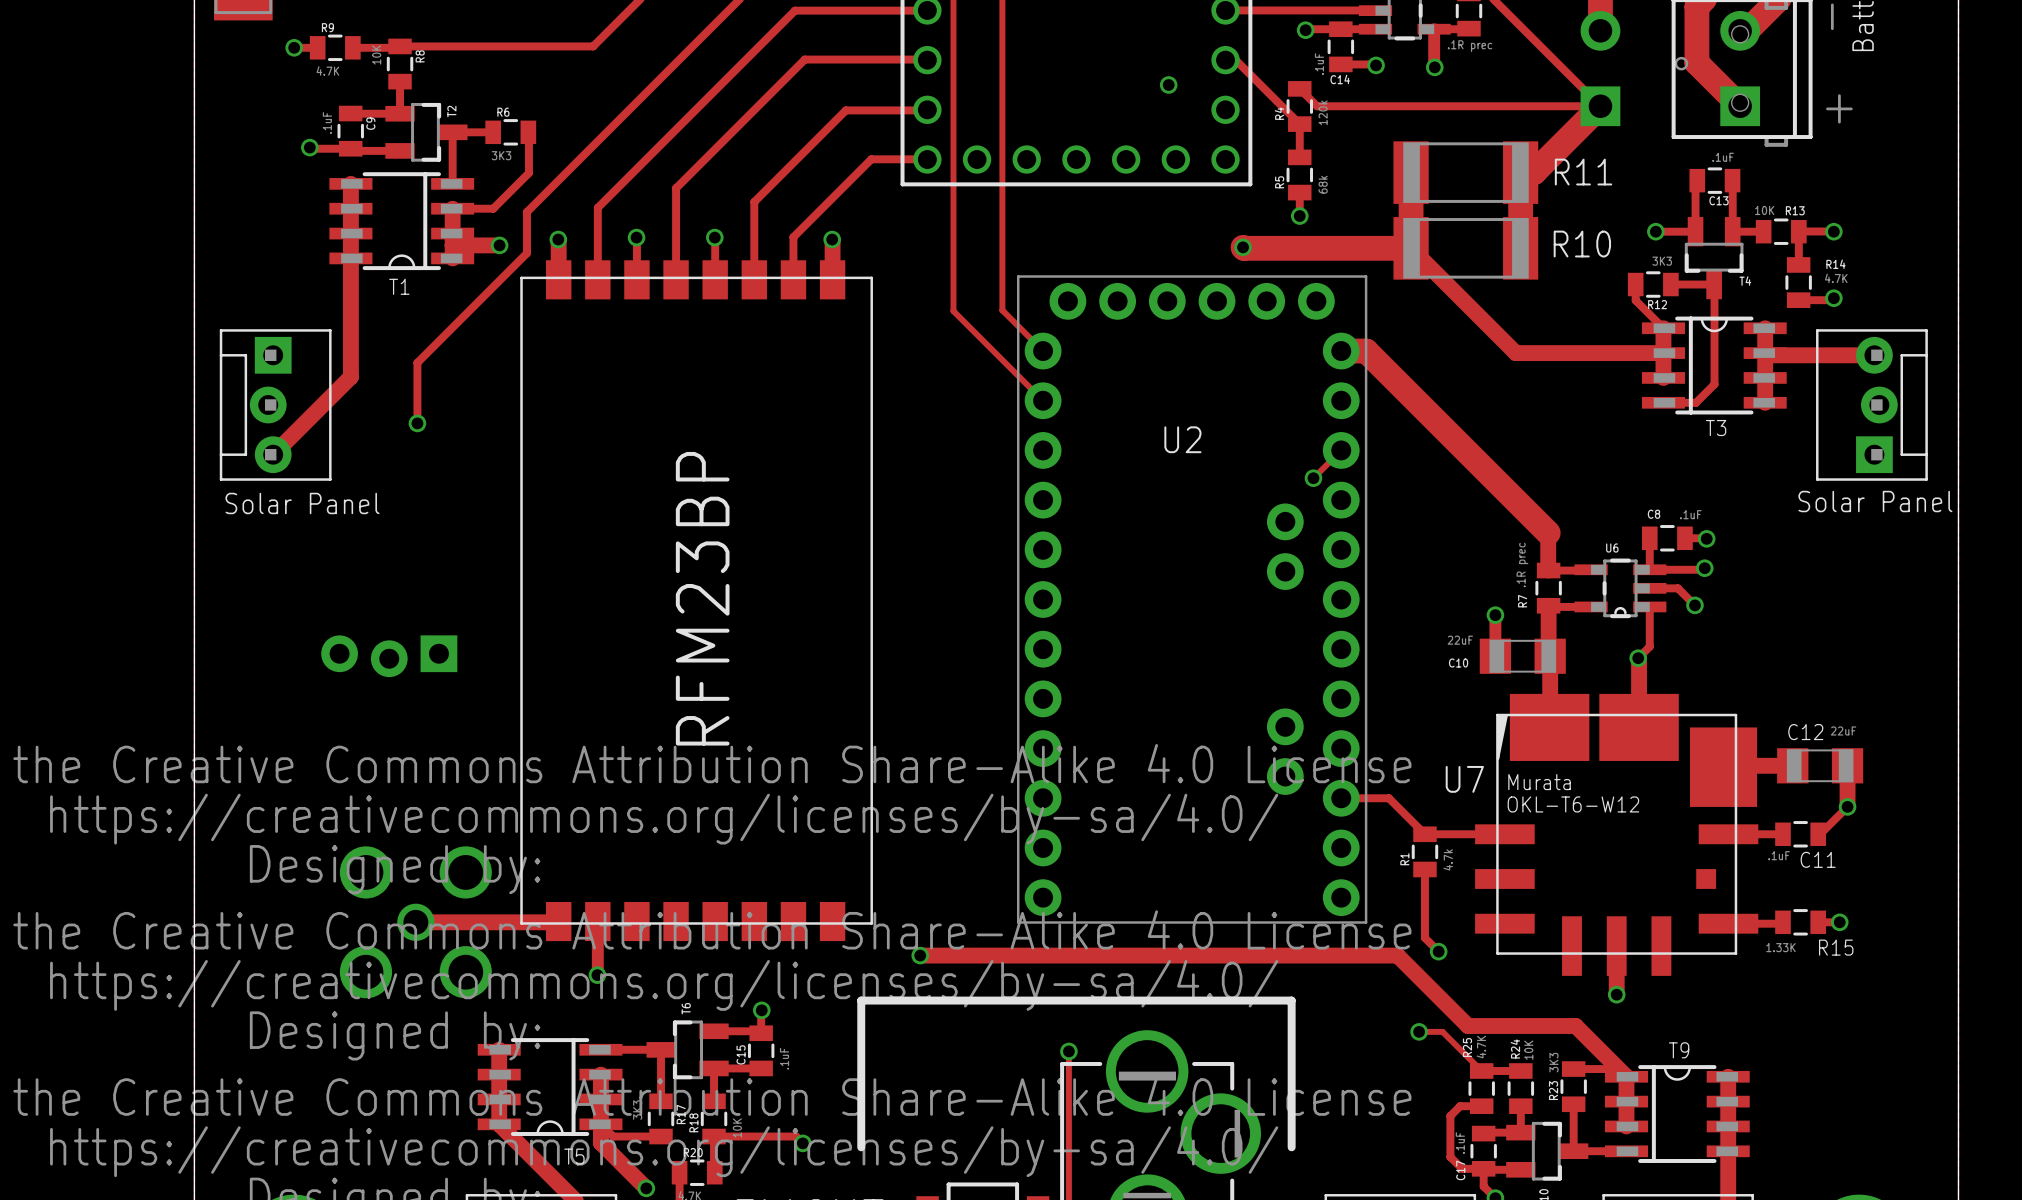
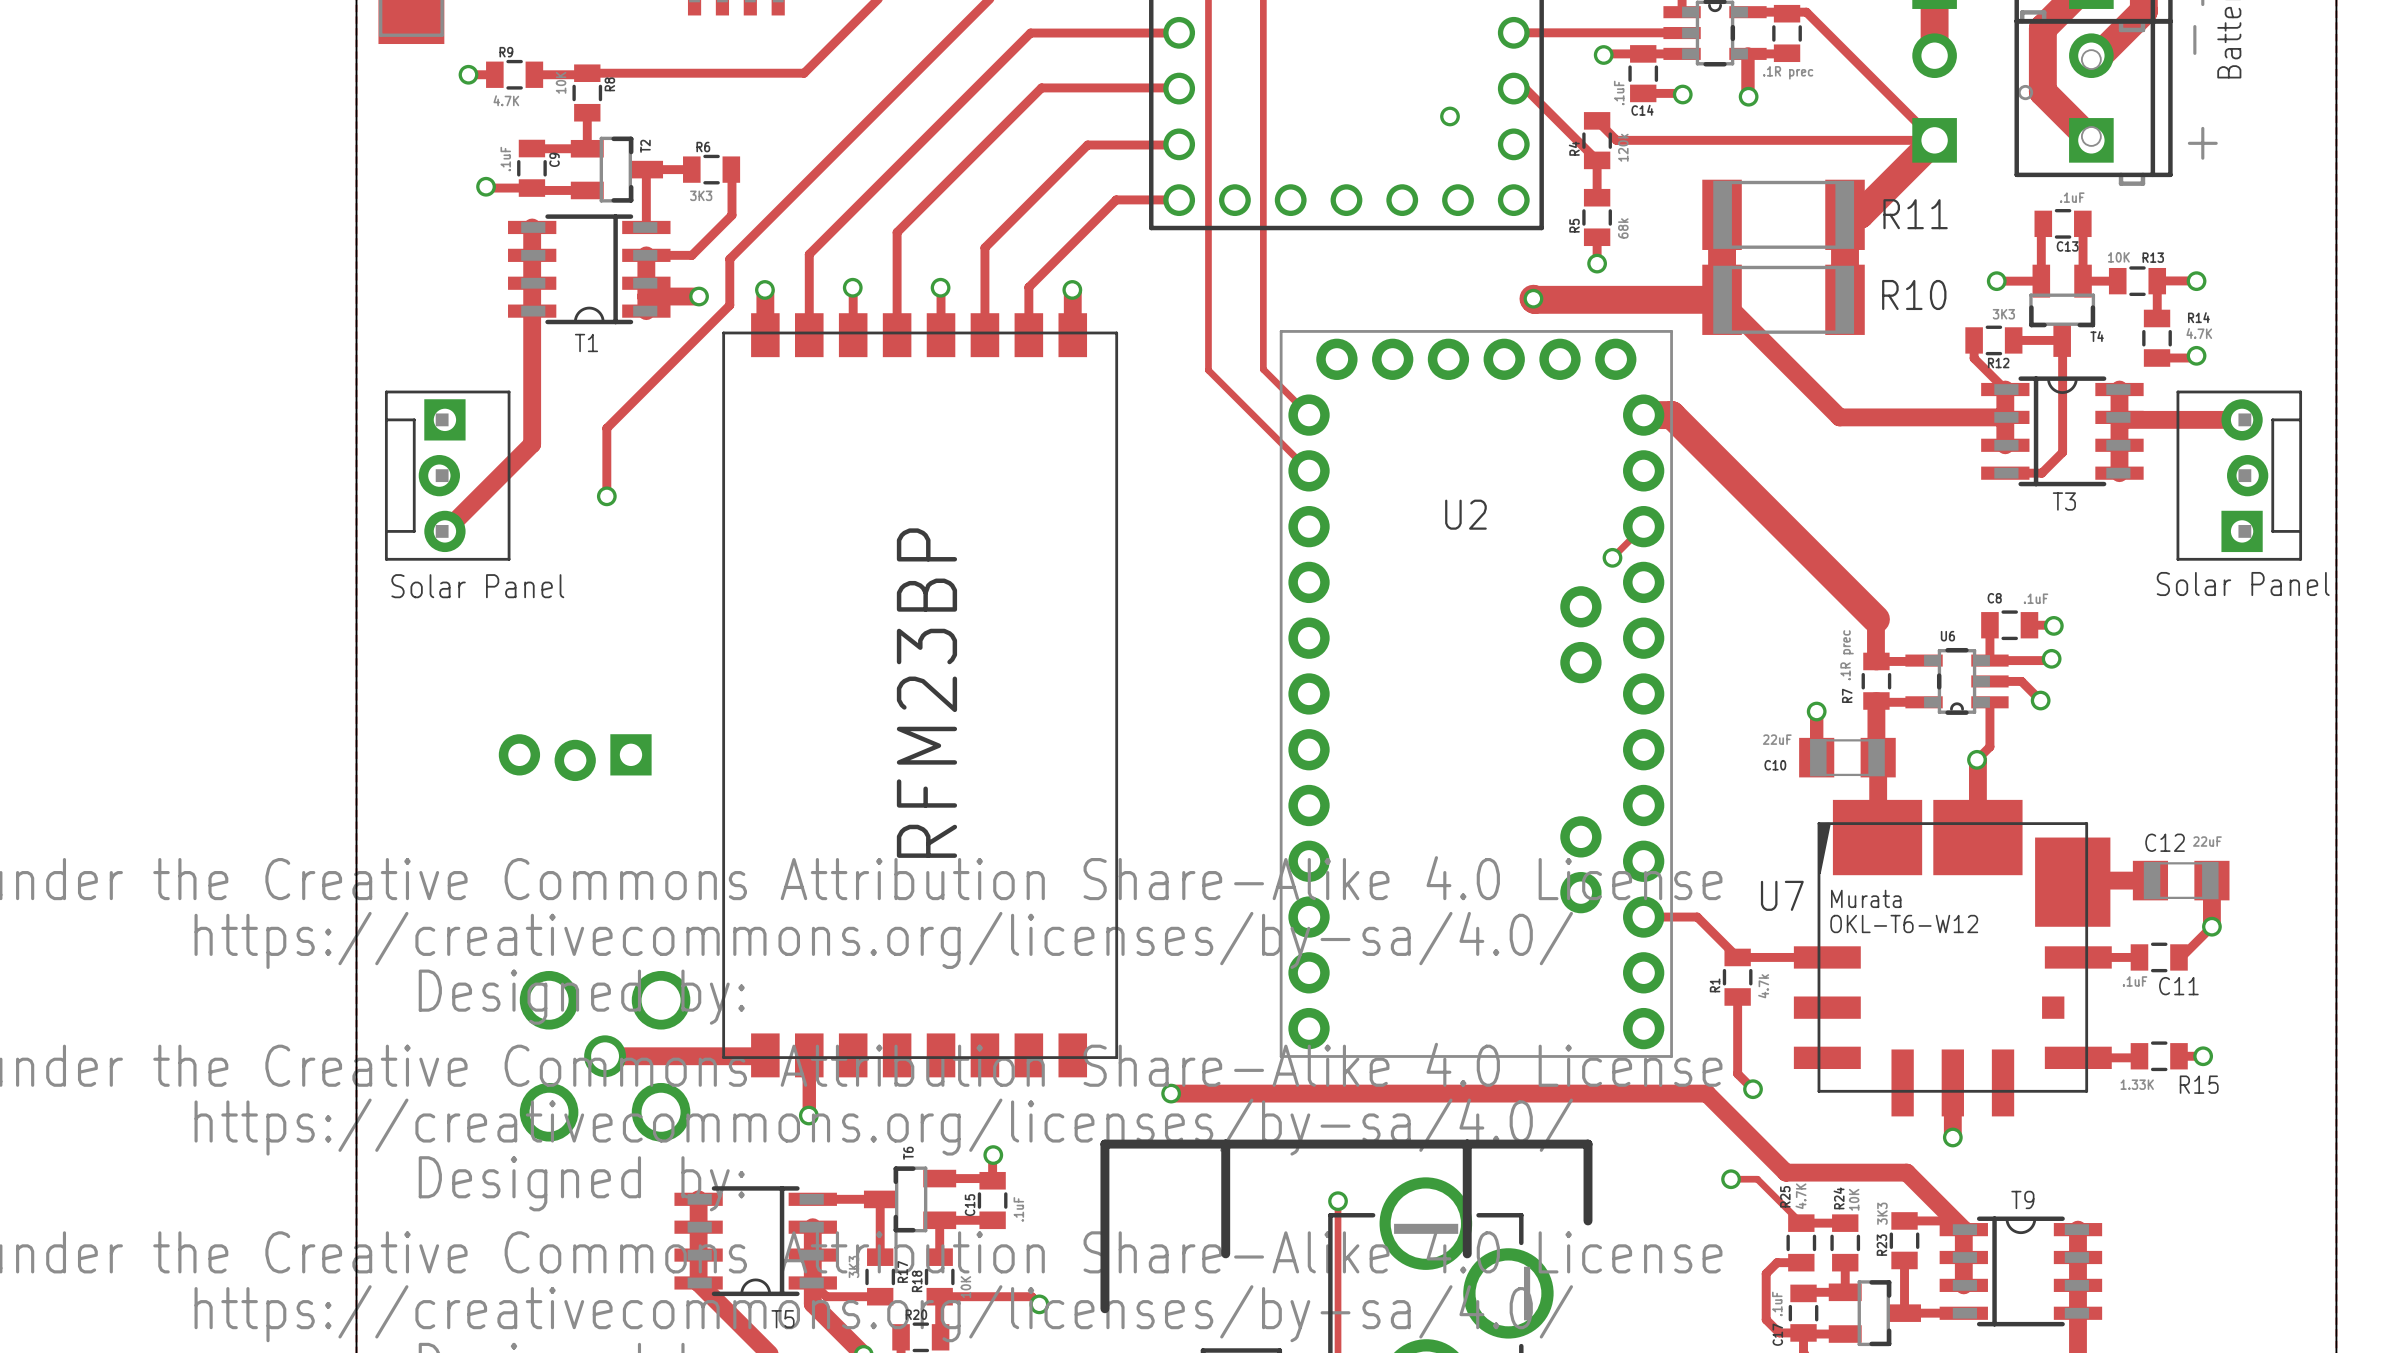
line: none -> (1225, 1144) (1225, 1253)
line: none -> (1467, 1144) (1467, 1253)
line: (1291, 1069) (1291, 1147) -> none

